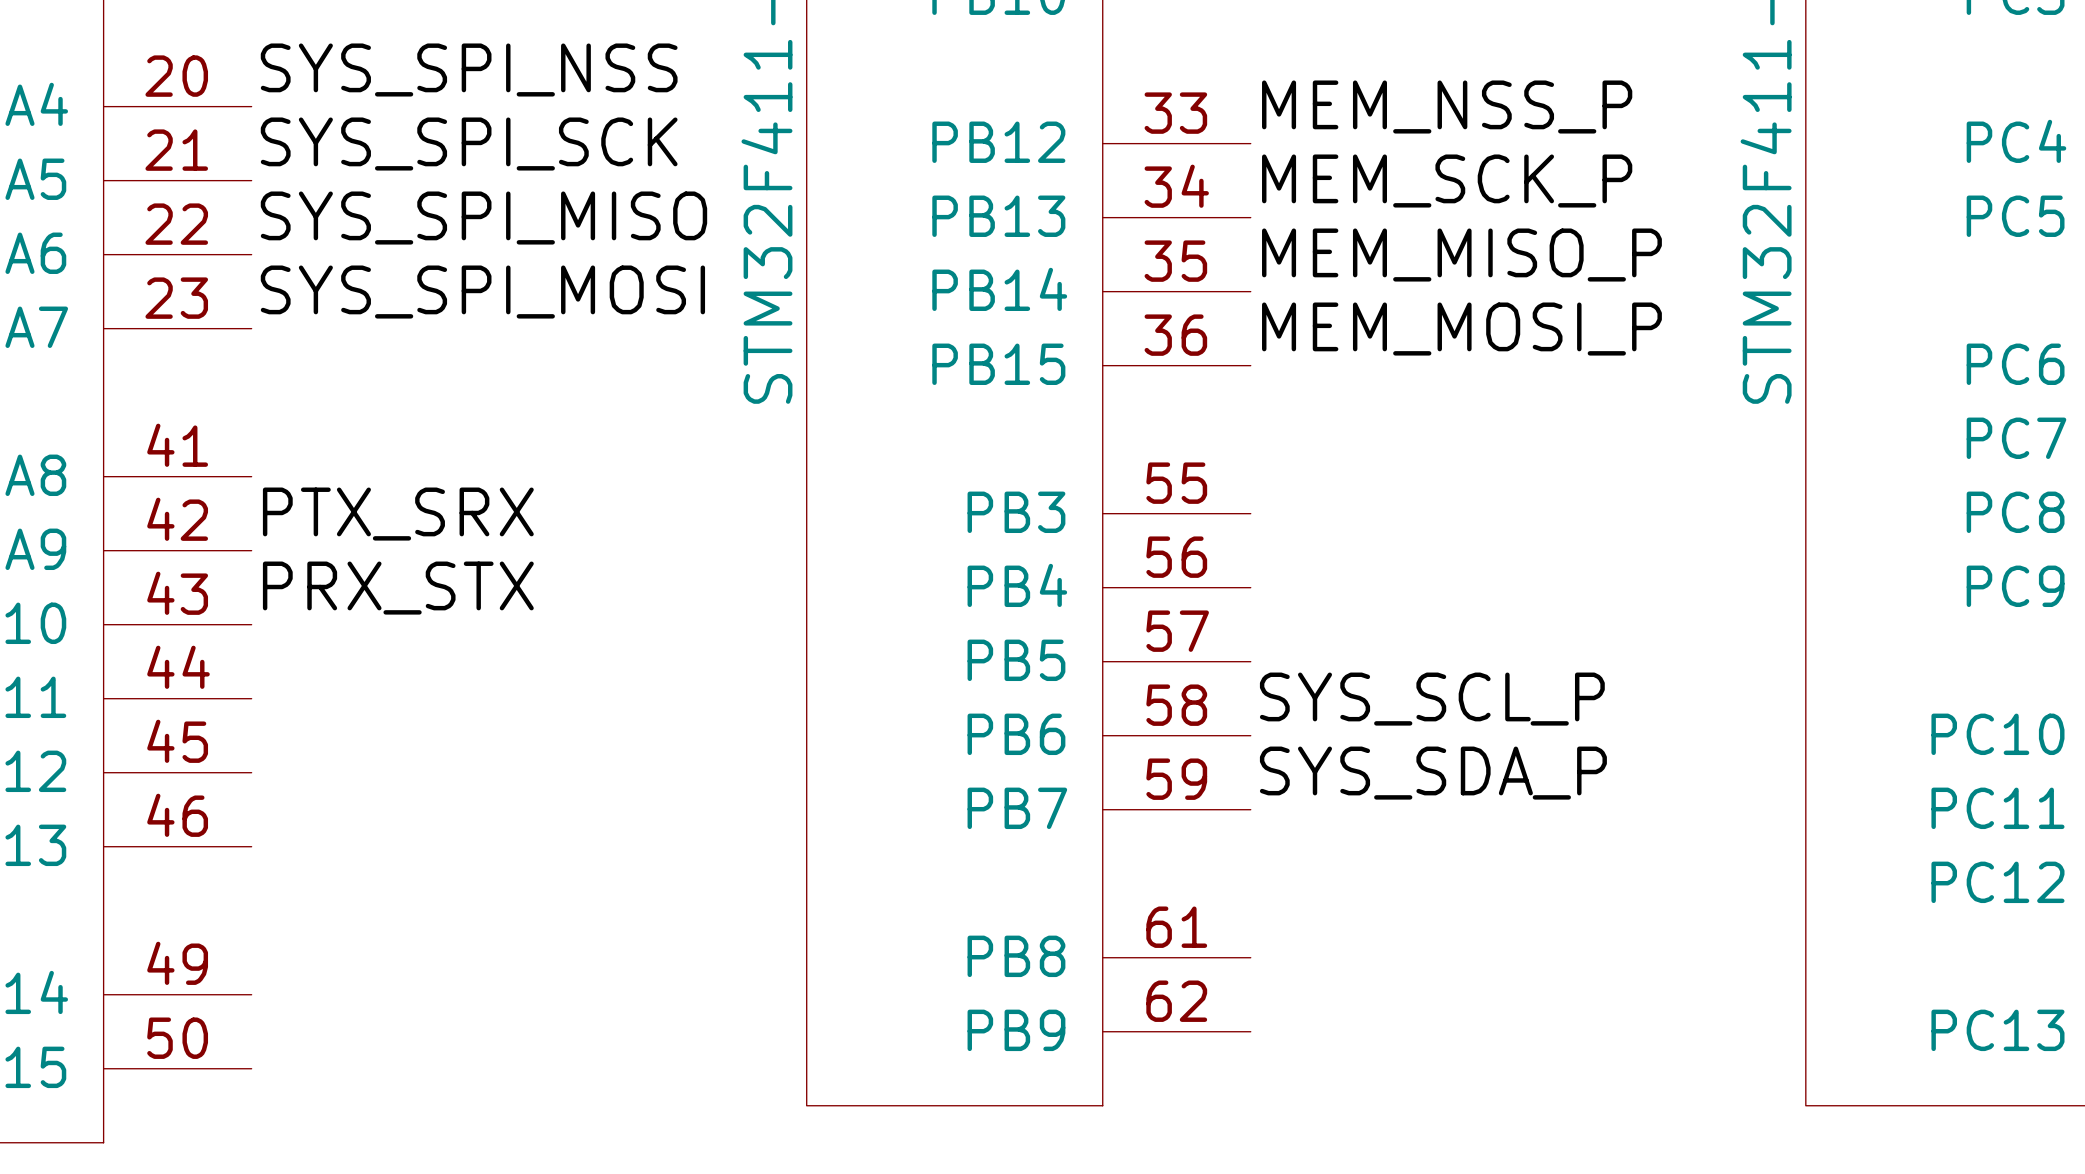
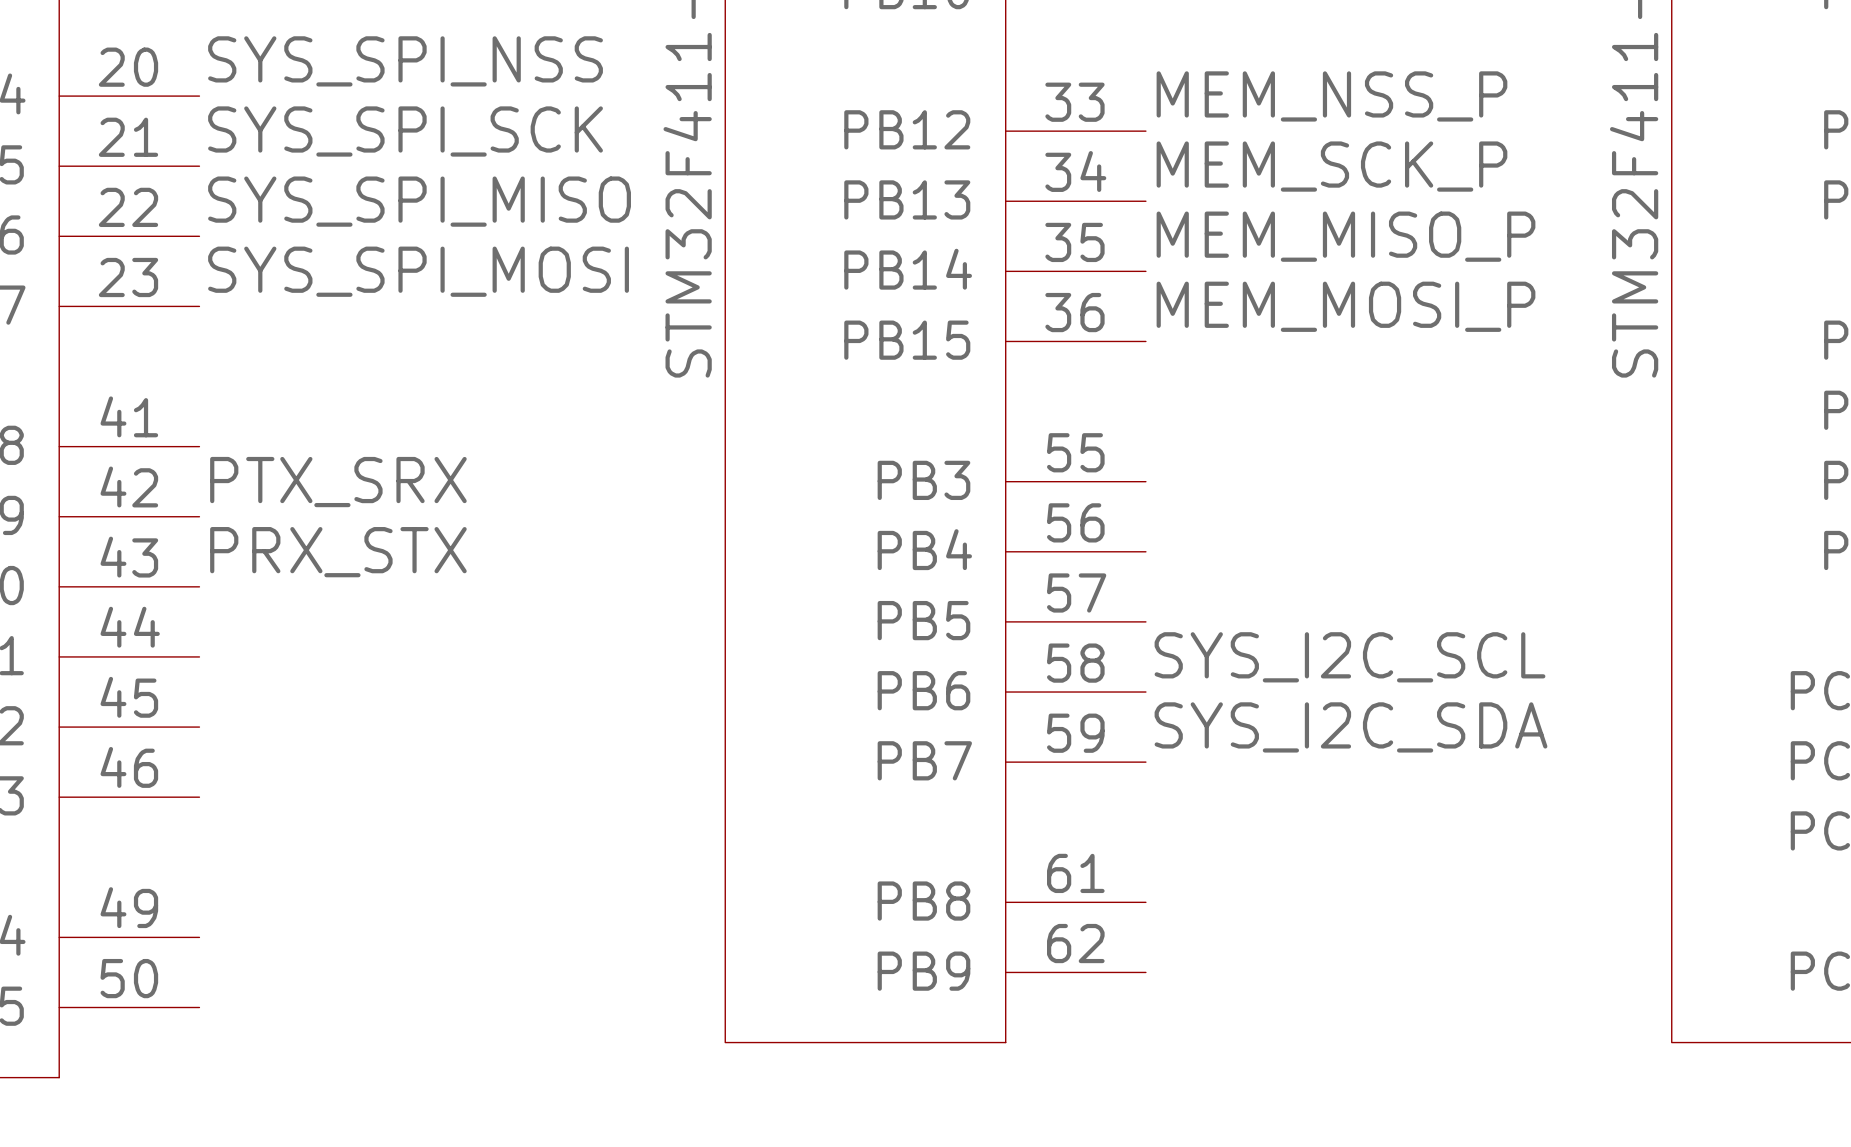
label: SYS_SCL_P (1432, 699) -> SYS_I2C_SCL (1350, 657)
label: SYS_SDA_P (1433, 773) -> SYS_I2C_SDA (1351, 727)

